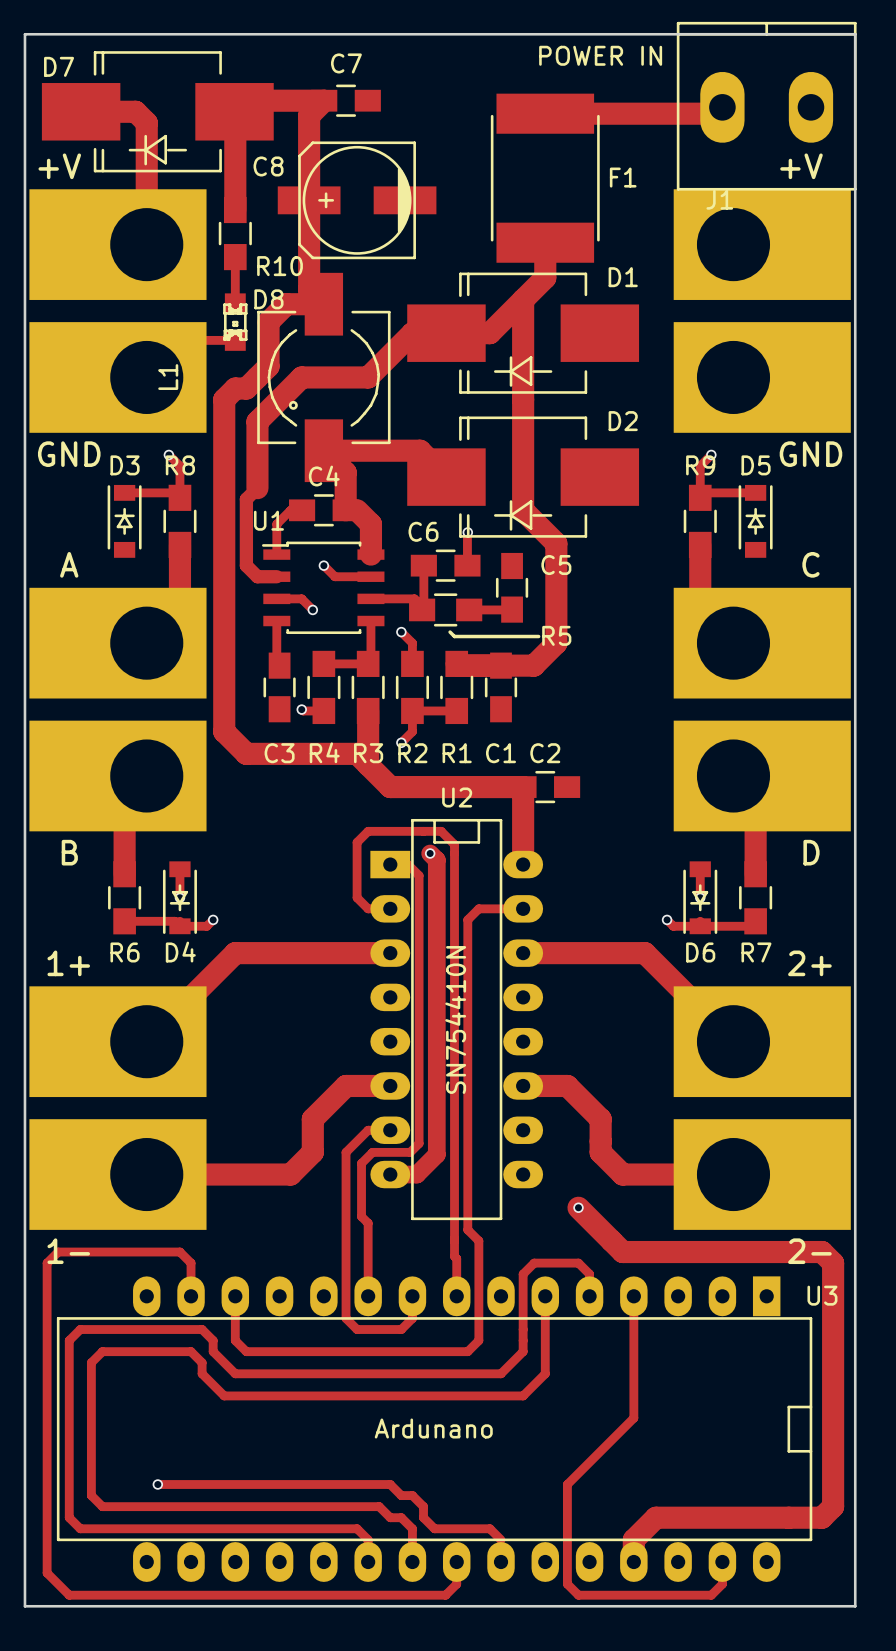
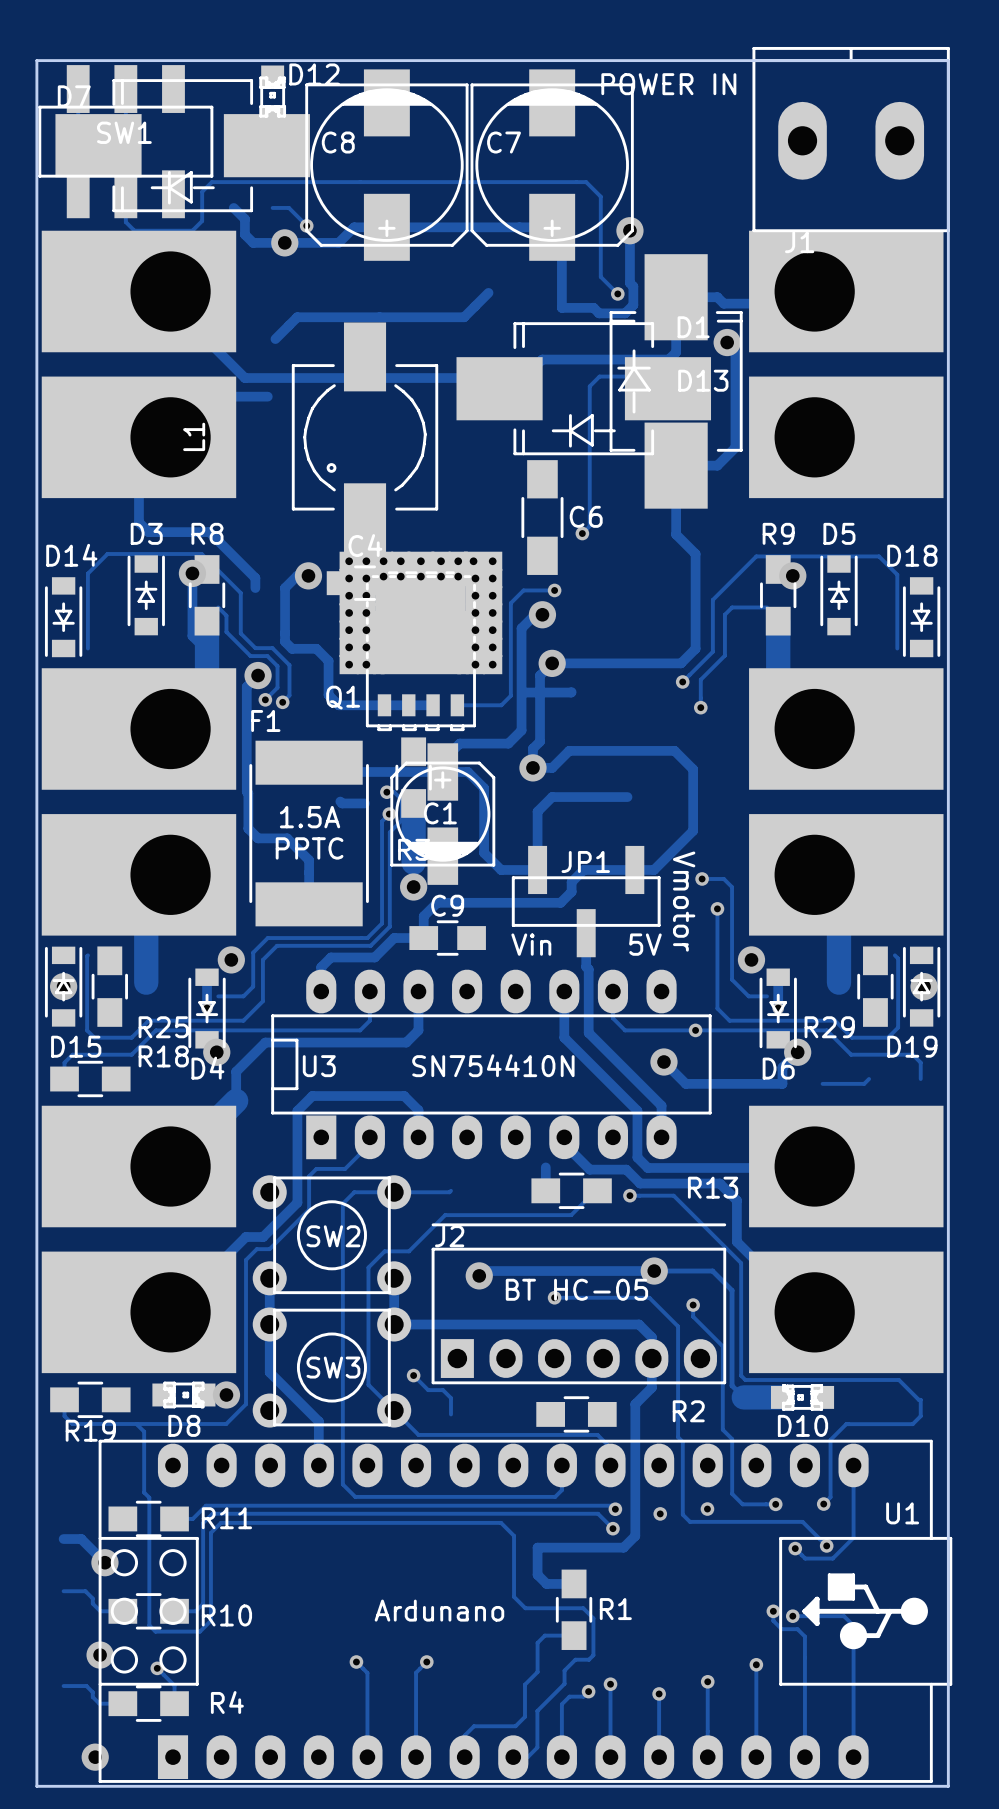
track: none -> (125, 89) (125, 222) (134, 230) (192, 230) (202, 221) (202, 191) (211, 182) (586, 182) (600, 196) (600, 276) (617, 293)
C7 name position: C7 (346, 63) -> C7 (504, 142)
D12: none -> (272, 97)
C7 footprint: [311, 84, 381, 117] -> [470, 69, 634, 261]
track: (722, 107) (716, 113) (545, 113) -> none
part: none -> (125, 141)
track: (81, 111) (135, 111) (146, 122) (146, 244) -> none
C8 footprint: [277, 141, 437, 260] -> [305, 69, 469, 261]
text: +V (59, 166) -> none
C8 name position: C8 (268, 166) -> C8 (338, 142)
text: +V (801, 166) -> none
track: none -> (233, 207) (244, 219) (244, 234) (253, 242) (338, 242) (354, 227) (552, 227) (561, 237) (561, 307) (593, 307) (599, 313) (625, 313) (633, 305) (633, 286) (629, 283) (629, 230)
track: none -> (272, 207) (288, 207) (306, 225)
F1 name position: F1 (623, 177) -> F1 (265, 721)
F1 position: (545, 178) -> (309, 833)
via: none -> (306, 225)
via: none -> (629, 230)
via: none -> (284, 242)
track: (235, 210) (234, 111) (245, 100) (324, 100) (309, 115) (309, 289) (323, 304) (286, 304) (268, 322) (268, 366) (246, 388) (235, 388) (224, 399) (224, 731) (246, 753) (357, 753) (390, 787) (523, 787) (523, 864) -> none
R10 rotation: 0° (235, 233) -> 90° clockwise (148, 1611)
R10 position: (235, 233) -> (148, 1611)
track: (545, 242) (545, 277) (489, 333) (412, 333) (368, 377) (301, 377) (257, 421) (257, 488) (246, 499) (246, 565) (257, 576) (276, 576) -> none
track: none -> (488, 292) (464, 317) (297, 317) (275, 339)
via: none -> (617, 293)
track: none -> (170, 303) (244, 378) (523, 378) (542, 359) (668, 359) (676, 352) (676, 297) (717, 297) (723, 303) (814, 303)
track: (235, 257) (235, 303) -> none
R10 name position: R10 (280, 266) -> R10 (226, 1615)
track: none -> (727, 342) (735, 353) (735, 447) (717, 465) (676, 465) (676, 534) (695, 554) (695, 648) (680, 663) (552, 663) (540, 675) (540, 741) (532, 748) (532, 767) (552, 767) (569, 750) (674, 750) (693, 769) (693, 830) (654, 869) (583, 869) (571, 882) (571, 891) (560, 902) (437, 902) (423, 916) (423, 938)
via: none -> (727, 342)
D8 name position: D8 (268, 299) -> D8 (184, 1425)
track: (523, 299) (523, 510) (556, 543) (556, 643) (533, 665) (458, 665) (456, 663) -> none
track: none -> (683, 369) (677, 376) (599, 376) (589, 386) (589, 526) (582, 533)
D8 rotation: 0° (235, 322) -> 90° counterclockwise (183, 1394)
D8 position: (235, 322) -> (183, 1394)
part: none -> (676, 381)
track: none -> (170, 449) (138, 481) (138, 522) (148, 532) (209, 532) (255, 578) (255, 588)
text: GND (69, 454) -> none
track: (168, 454) (179, 466) (179, 497) (174, 492) (124, 492) -> none
via: (168, 454) -> none
track: (711, 454) (700, 466) (700, 497) (705, 492) (755, 492) -> none
via: (711, 454) -> none
text: GND (810, 454) -> none
via: none -> (582, 533)
track: (446, 477) (420, 450) (323, 450) (345, 472) (345, 510) (357, 510) (370, 524) (370, 554) -> none
D2: (523, 477) -> none
track: none -> (192, 573) (192, 636) (202, 646)
via: none -> (192, 573)
track: none -> (308, 575) (297, 575) (285, 588) (285, 641) (292, 648) (316, 648) (328, 660) (328, 694) (338, 705) (433, 705)
via: none -> (308, 575)
via: none -> (792, 575)
track: (302, 510) (290, 510) (276, 524) (276, 554) -> none
track: none -> (554, 590) (523, 590) (510, 603) (510, 695) (501, 705) (457, 705)
via: none -> (554, 590)
U1 name position: U1 (268, 520) -> U1 (902, 1513)
C6 name position: C6 (423, 531) -> C6 (586, 516)
track: none -> (218, 607) (226, 615) (226, 631) (250, 656) (267, 656) (277, 666) (277, 687) (265, 699)
track: (467, 532) (467, 565) -> none
via: (467, 532) -> none
track: none -> (766, 607) (732, 607) (724, 614) (724, 655) (700, 679) (700, 707)
track: none -> (542, 614) (535, 614) (521, 628) (521, 730) (508, 743) (459, 743) (442, 760) (442, 771)
via: none -> (542, 614)
D14: none -> (63, 617)
U1 footprint: [261, 541, 385, 635] -> [98, 1439, 953, 1783]
D18: none -> (921, 617)
C6 footprint: [410, 549, 481, 582] -> [521, 460, 564, 575]
Q1: none -> (420, 641)
text: A (69, 564) -> none
text: C (810, 564) -> none
track: (323, 565) (334, 576) (370, 576) -> none
via: (323, 565) -> none
track: (423, 565) (423, 608) (414, 598) (370, 598) -> none
track: none -> (87, 648) (87, 573) (107, 554) (201, 554) (240, 593) (240, 633) (255, 648) (272, 648) (289, 665) (289, 695) (282, 702)
track: none -> (897, 648) (897, 574) (879, 556) (756, 556) (712, 599) (712, 651) (682, 681)
via: none -> (552, 663)
C5: (512, 587) -> none
track: none -> (258, 675) (246, 686) (248, 828) (258, 838) (287, 838) (309, 860) (309, 904)
via: none -> (258, 675)
track: (276, 598) (301, 598) (312, 609) -> none
via: none -> (682, 681)
via: (312, 609) -> none
R5: (445, 609) -> none
via: none -> (265, 699)
via: none -> (282, 702)
track: (276, 621) (276, 662) (279, 665) -> none
track: (370, 621) (370, 661) (368, 663) (323, 663) -> none
via: none -> (700, 707)
track: (401, 632) (412, 643) (412, 663) -> none
via: (401, 632) -> none
line: (450, 632) (454, 636) (538, 636) -> none
C1 footprint: [484, 652, 518, 723] -> [390, 743, 496, 885]
track: none -> (309, 762) (318, 771) (467, 771) (484, 788) (484, 852) (501, 869) (537, 869) (537, 811) (552, 797) (627, 797)
via: none -> (532, 767)
C3: (279, 687) -> none
R4 rotation: 0° (323, 687) -> 90° clockwise (148, 1703)
R4 position: (323, 687) -> (148, 1703)
R2 rotation: 0° (412, 687) -> 90° clockwise (576, 1414)
R2 position: (412, 687) -> (576, 1414)
R1 position: (456, 687) -> (574, 1609)
track: none -> (386, 792) (394, 792) (401, 799) (401, 820) (389, 832) (389, 926) (370, 945) (277, 945) (262, 959) (262, 1001) (243, 1020) (148, 1020) (131, 1037) (94, 1037) (87, 1030) (87, 955)
via: none -> (386, 792)
via: (301, 709) -> none
track: (456, 710) (412, 710) (412, 731) (401, 742) -> none
track: none -> (389, 814) (382, 821) (382, 923) (367, 938) (267, 938) (253, 952) (253, 986) (243, 996) (218, 996)
via: none -> (389, 814)
text: none -> 1.5A (310, 817)
via: (401, 742) -> none
text: none -> PPTC (309, 848)
R4 name position: R4 (324, 752) -> R4 (227, 1702)
R2 name position: R2 (412, 753) -> R2 (688, 1411)
R1 name position: R1 (457, 753) -> R1 (615, 1609)
C1 name position: C1 (501, 753) -> C1 (440, 813)
track: none -> (702, 878) (723, 878) (732, 887) (732, 979) (748, 996) (766, 996)
via: none -> (702, 878)
via: none -> (413, 886)
C2: (545, 787) -> none
JP1: none -> (586, 901)
text: none -> Vmotor (684, 901)
track: none -> (717, 908) (717, 1008) (729, 1020) (834, 1020) (852, 1037) (888, 1037) (898, 1027) (898, 958) (894, 955)
via: none -> (717, 908)
track: none -> (586, 933) (586, 966) (588, 969) (588, 1032) (661, 1105) (661, 1137)
track: none -> (426, 938) (394, 938) (374, 957) (330, 957) (321, 967) (321, 991)
C9: none -> (447, 938)
text: none -> Vin (531, 944)
text: none -> 5V (645, 944)
text: B (69, 852) -> none
text: D (811, 852) -> none
via: none -> (231, 959)
track: (430, 853) (436, 860) (436, 1154) (416, 1174) (390, 1174) -> none
via: (430, 853) -> none
via: none -> (751, 959)
track: (390, 864) (408, 864) (419, 875) (419, 1143) (410, 1152) (372, 1152) (361, 1163) (361, 1216) (368, 1223) (368, 1296) -> none
D15: none -> (63, 986)
via: none -> (63, 986)
R25: none -> (109, 986)
R29: none -> (875, 986)
D19: none -> (921, 986)
via: none -> (924, 986)
track: none -> (369, 991) (369, 1020) (360, 1030) (155, 1030) (131, 1054) (72, 1054) (64, 1062) (64, 1079)
track: none -> (612, 991) (612, 1018) (625, 1030) (826, 1030) (851, 1054) (912, 1054) (920, 1062) (920, 1079)
R6: (124, 897) -> none
R7: (755, 897) -> none
track: (390, 908) (368, 908) (357, 897) (357, 842) (368, 831) (441, 831) (454, 844) (454, 1256) (456, 1258) (456, 1296) -> none
track: (523, 908) (478, 908) (467, 919) (467, 1229) (478, 1240) (478, 1340) (467, 1351) (246, 1351) (235, 1340) (235, 1296) -> none
via: none -> (695, 1030)
track: (213, 919) (206, 926) (179, 926) (174, 921) (124, 921) -> none
via: (213, 919) -> none
track: (667, 919) (673, 926) (750, 926) (755, 921) -> none
via: (667, 919) -> none
via: none -> (216, 1052)
track: none -> (797, 1052) (782, 1067) (782, 1083) (685, 1083) (663, 1062)
via: none -> (797, 1052)
via: none -> (663, 1062)
track: (390, 953) (235, 953) (206, 981) -> (418, 984) (418, 1030) (406, 1042) (265, 1042) (236, 1071) (236, 1100)
track: (523, 953) (644, 953) (733, 1041) -> (564, 991) (564, 1037) (637, 1110) (637, 1157) (647, 1167) (814, 1166)
R18: none -> (90, 1079)
track: none -> (869, 1079) (864, 1083) (822, 1083)
text: 1+ (68, 963) -> none
text: 2+ (809, 963) -> none
track: none -> (369, 1137) (369, 1144) (345, 1168) (316, 1168) (309, 1176) (309, 1209) (269, 1249) (256, 1249) (246, 1259) (246, 1404) (226, 1424) (72, 1424) (64, 1416) (64, 1399)
track: none -> (418, 1137) (418, 1110) (404, 1096) (312, 1096) (297, 1110) (297, 1202) (263, 1237) (245, 1237) (170, 1312)
U2: SN754410N (456, 1019) -> none
track: none -> (545, 1167) (545, 1190)
track: none -> (450, 1190) (354, 1192) (342, 1203) (342, 1484) (355, 1496) (555, 1496) (561, 1490) (561, 1465)
R13: none -> (571, 1190)
track: none -> (597, 1190) (571, 1215) (445, 1215) (408, 1251) (384, 1251) (368, 1267) (368, 1384) (418, 1434) (597, 1434) (610, 1447) (610, 1465)
track: none -> (629, 1195) (673, 1195) (741, 1263) (741, 1375) (745, 1379) (898, 1379) (920, 1399) (920, 1416) (912, 1424) (846, 1424) (830, 1439) (830, 1497) (823, 1504)
via: none -> (629, 1195)
track: (390, 1085) (346, 1085) (312, 1119) (312, 1152) (290, 1174) (171, 1174) -> none
track: (523, 1085) (567, 1085) (600, 1119) (600, 1152) (622, 1174) (726, 1174) -> (564, 1130) (564, 1144) (589, 1169) (626, 1169) (640, 1183) (719, 1183) (736, 1200) (736, 1241) (807, 1312)
SW2: none -> (331, 1235)
track: (390, 1130) (368, 1130) (346, 1152) (346, 1318) (357, 1329) (401, 1329) (412, 1318) (412, 1296) -> none
via: none -> (654, 1271)
via: none -> (479, 1275)
track: none -> (269, 1278) (269, 1372) (318, 1421) (318, 1465)
track: none -> (394, 1278) (394, 1324) (639, 1324) (651, 1337) (651, 1387) (635, 1404) (635, 1535) (623, 1547) (537, 1547) (537, 1574) (546, 1583) (574, 1583)
track: none -> (554, 1297) (649, 1297) (678, 1326) (678, 1437) (682, 1441) (682, 1514) (689, 1521) (802, 1521) (826, 1545)
via: none -> (554, 1297)
J2: none -> BT HC-05 (578, 1303)
track: none -> (693, 1305) (693, 1316) (722, 1346) (722, 1429) (732, 1439) (732, 1493) (742, 1504) (775, 1504)
via: none -> (693, 1305)
track: (578, 1207) (622, 1252) (668, 1252) -> (479, 1275) (484, 1271) (712, 1271) (732, 1290) (732, 1385) (743, 1397)
via: (578, 1207) -> none
SW3: none -> (331, 1367)
track: none -> (413, 1375) (428, 1390) (443, 1390) (450, 1398) (450, 1414)
via: none -> (413, 1375)
via: none -> (226, 1394)
text: 1- (68, 1251) -> none
text: 2- (809, 1251) -> none
track: (704, 1252) (822, 1252) (833, 1263) (833, 1506) (822, 1517) (655, 1517) (633, 1539) (633, 1562) -> none
D10: none -> (802, 1397)
R19: none -> (90, 1399)
U3 footprint: [56, 1276, 813, 1582] -> [271, 969, 712, 1160]
track: none -> (136, 1424) (144, 1431) (144, 1492) (149, 1497) (149, 1625) (155, 1631) (200, 1631) (210, 1620) (210, 1532) (220, 1522) (501, 1522) (514, 1535) (514, 1596) (525, 1608) (583, 1608) (593, 1618) (593, 1655) (588, 1659) (575, 1659) (564, 1670) (564, 1683) (537, 1710) (537, 1747) (527, 1757) (513, 1757)
U3 name position: U3 (822, 1295) -> U3 (319, 1066)
track: (191, 1296) (191, 1263) (179, 1252) (58, 1252) (47, 1263) (47, 1573) (69, 1595) (445, 1595) (456, 1584) (456, 1562) -> none
track: (545, 1296) (545, 1373) (523, 1395) (224, 1395) (202, 1373) (202, 1362) (191, 1351) (102, 1351) (91, 1362) (91, 1495) (102, 1506) (379, 1506) (390, 1517) (401, 1517) (412, 1528) (412, 1562) -> none
track: (589, 1296) (589, 1274) (578, 1263) (534, 1263) (523, 1274) (523, 1351) (501, 1373) (235, 1373) (213, 1351) (213, 1340) (202, 1329) (80, 1329) (69, 1340) (69, 1517) (80, 1528) (357, 1528) (368, 1539) (368, 1562) -> none
track: (633, 1296) (633, 1418) (567, 1484) (567, 1584) (578, 1595) (711, 1595) (722, 1584) (722, 1562) -> none
track: none -> (853, 1465) (853, 1537) (832, 1558) (805, 1558) (795, 1548)
via: none -> (775, 1504)
via: none -> (823, 1504)
track: none -> (615, 1509) (611, 1505) (206, 1505) (192, 1518) (174, 1518)
via: none -> (615, 1509)
via: none -> (707, 1509)
via: none -> (660, 1513)
R11: none -> (148, 1518)
track: none -> (612, 1528) (598, 1513) (212, 1513) (203, 1523) (203, 1603) (195, 1611) (174, 1611)
via: none -> (612, 1528)
track: none -> (63, 1539) (81, 1539) (104, 1562)
via: none -> (826, 1545)
via: none -> (795, 1548)
via: none -> (104, 1562)
track: none -> (63, 1591) (85, 1591) (92, 1598) (92, 1603) (100, 1611) (122, 1611)
U3 value: Ardunano (433, 1428) -> SN754410N (493, 1065)
U1 value: none -> Ardunano (439, 1610)
track: none -> (773, 1611) (773, 1620) (781, 1629) (797, 1629) (804, 1636) (804, 1757)
via: none -> (773, 1611)
track: none -> (792, 1616) (844, 1616) (853, 1625) (853, 1757)
via: none -> (792, 1616)
track: none -> (574, 1635) (544, 1635) (537, 1642) (537, 1672) (524, 1684) (524, 1716) (515, 1726) (474, 1726) (464, 1735) (464, 1757)
track: (157, 1484) (390, 1484) (401, 1495) (412, 1495) (423, 1506) (423, 1517) (434, 1528) (489, 1528) (501, 1539) (501, 1562) -> none
via: (157, 1484) -> none
via: none -> (100, 1655)
track: none -> (356, 1662) (367, 1673) (367, 1757)
via: none -> (356, 1662)
track: none -> (426, 1662) (416, 1672) (416, 1757)
via: none -> (426, 1662)
track: none -> (756, 1664) (756, 1757)
via: none -> (756, 1664)
track: none -> (157, 1668) (174, 1685) (174, 1703)
via: none -> (157, 1668)
track: none -> (707, 1681) (707, 1763)
via: none -> (707, 1681)
track: none -> (610, 1684) (610, 1757)
via: none -> (610, 1684)
track: none -> (63, 1686) (86, 1686) (99, 1703) (122, 1703)
track: none -> (588, 1691) (583, 1696) (569, 1696) (561, 1704) (561, 1757)
via: none -> (588, 1691)
track: none -> (659, 1693) (659, 1757)
via: none -> (659, 1693)
via: none -> (95, 1757)

